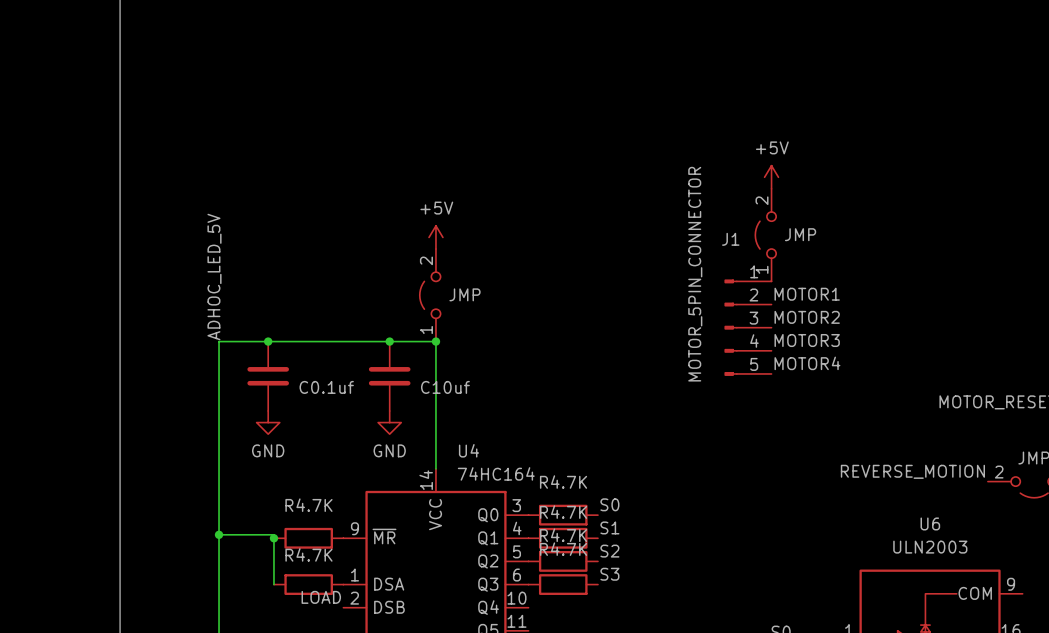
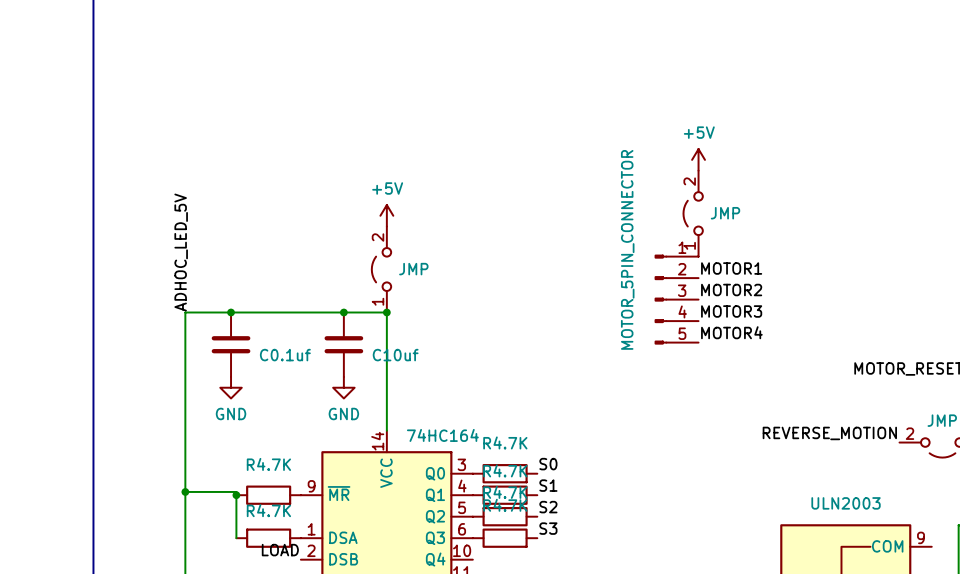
J1 name: J1 (730, 239) -> none
U4 name: U4 (469, 450) -> none
U6 name: U6 (930, 523) -> none

